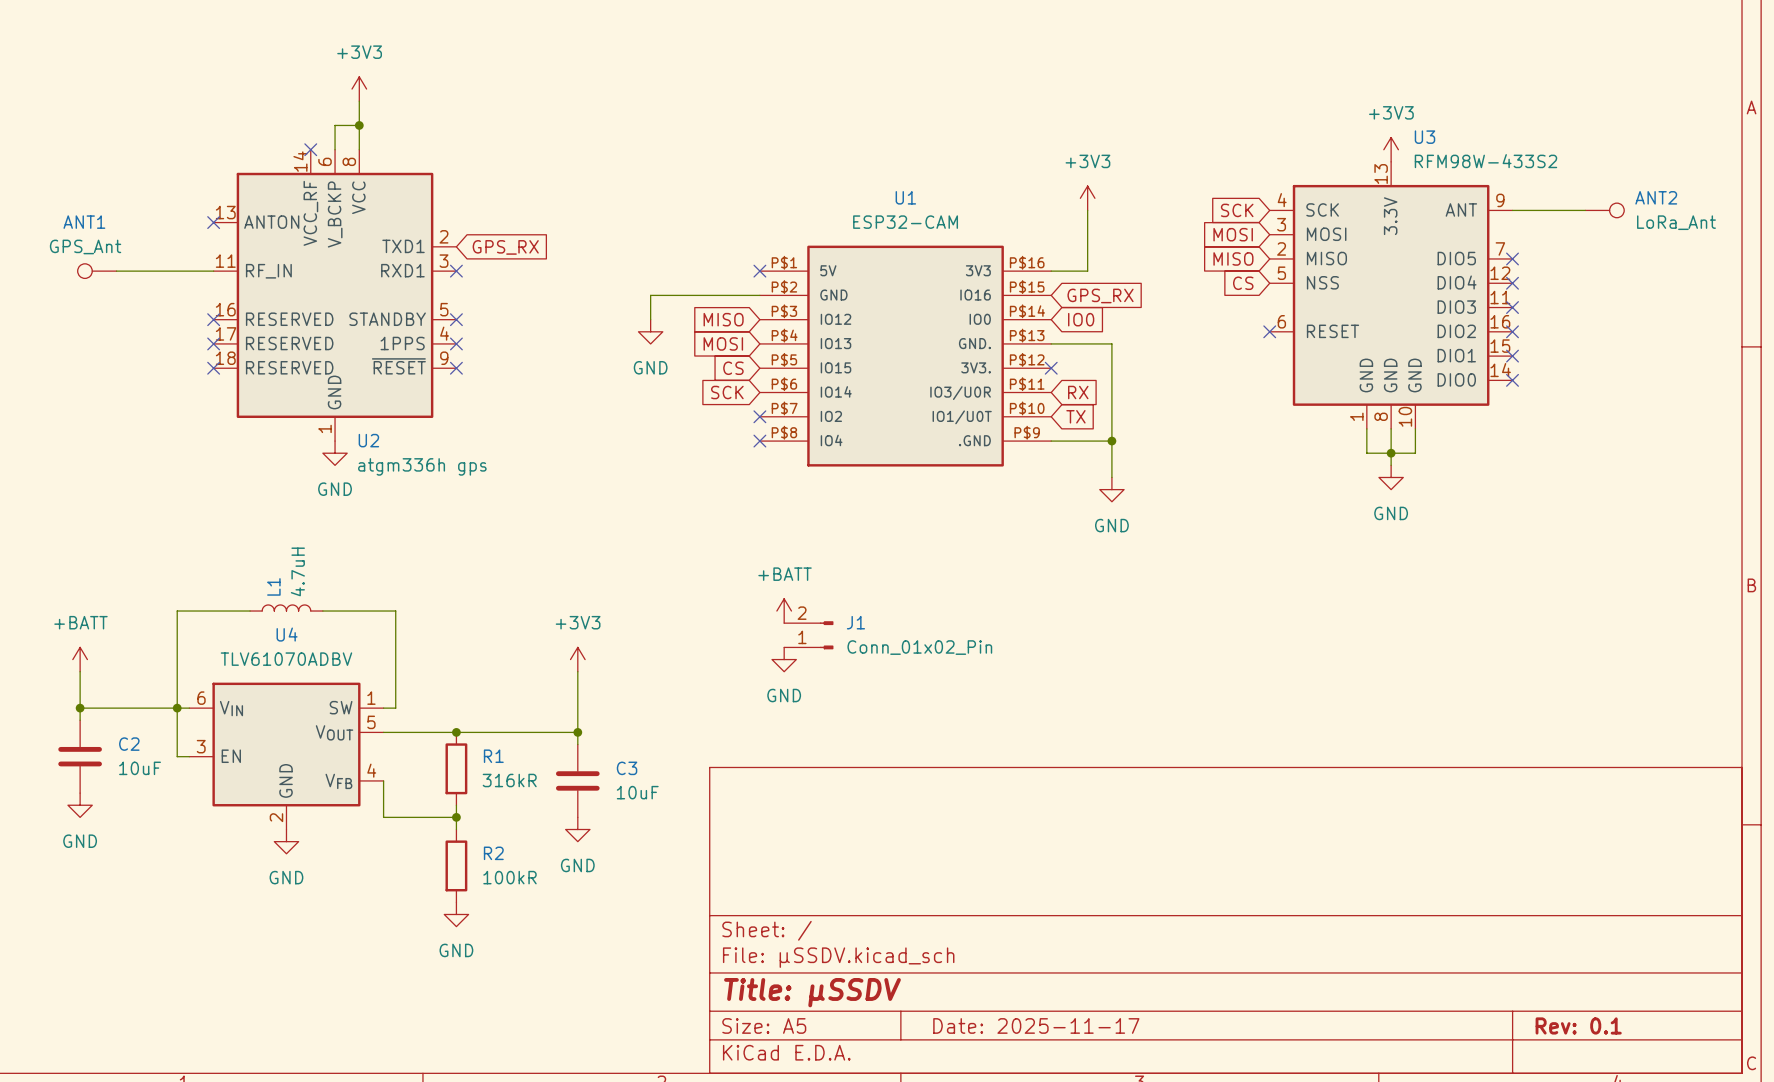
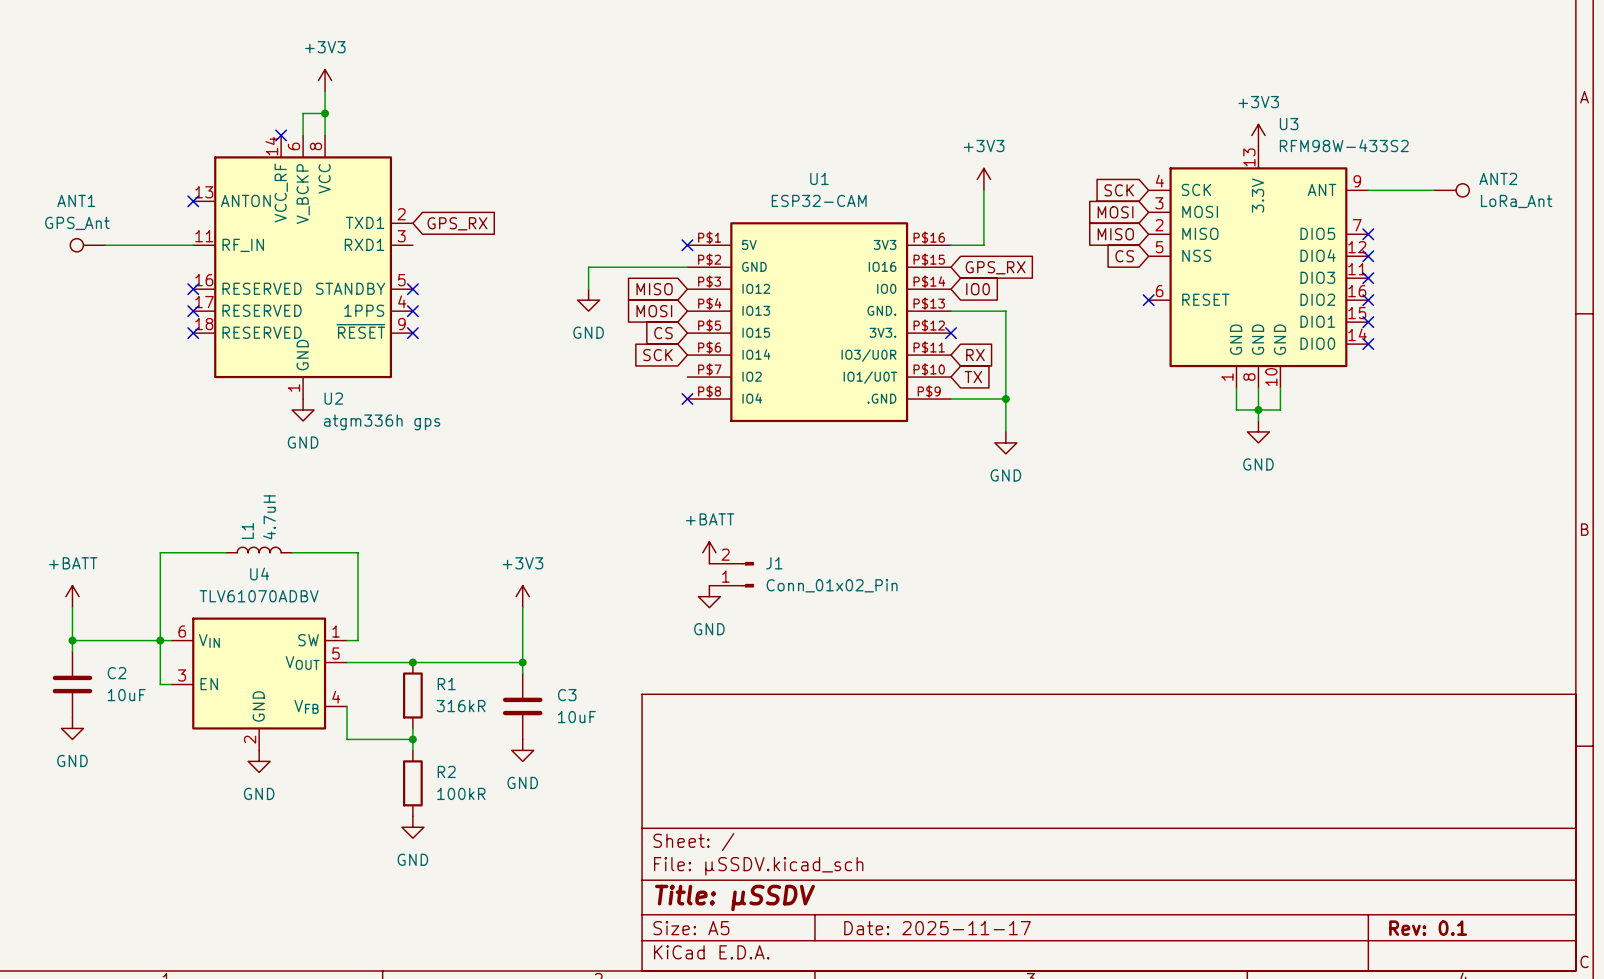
no-connect mark: (456, 271) -> none
no-connect mark: (759, 416) -> none

